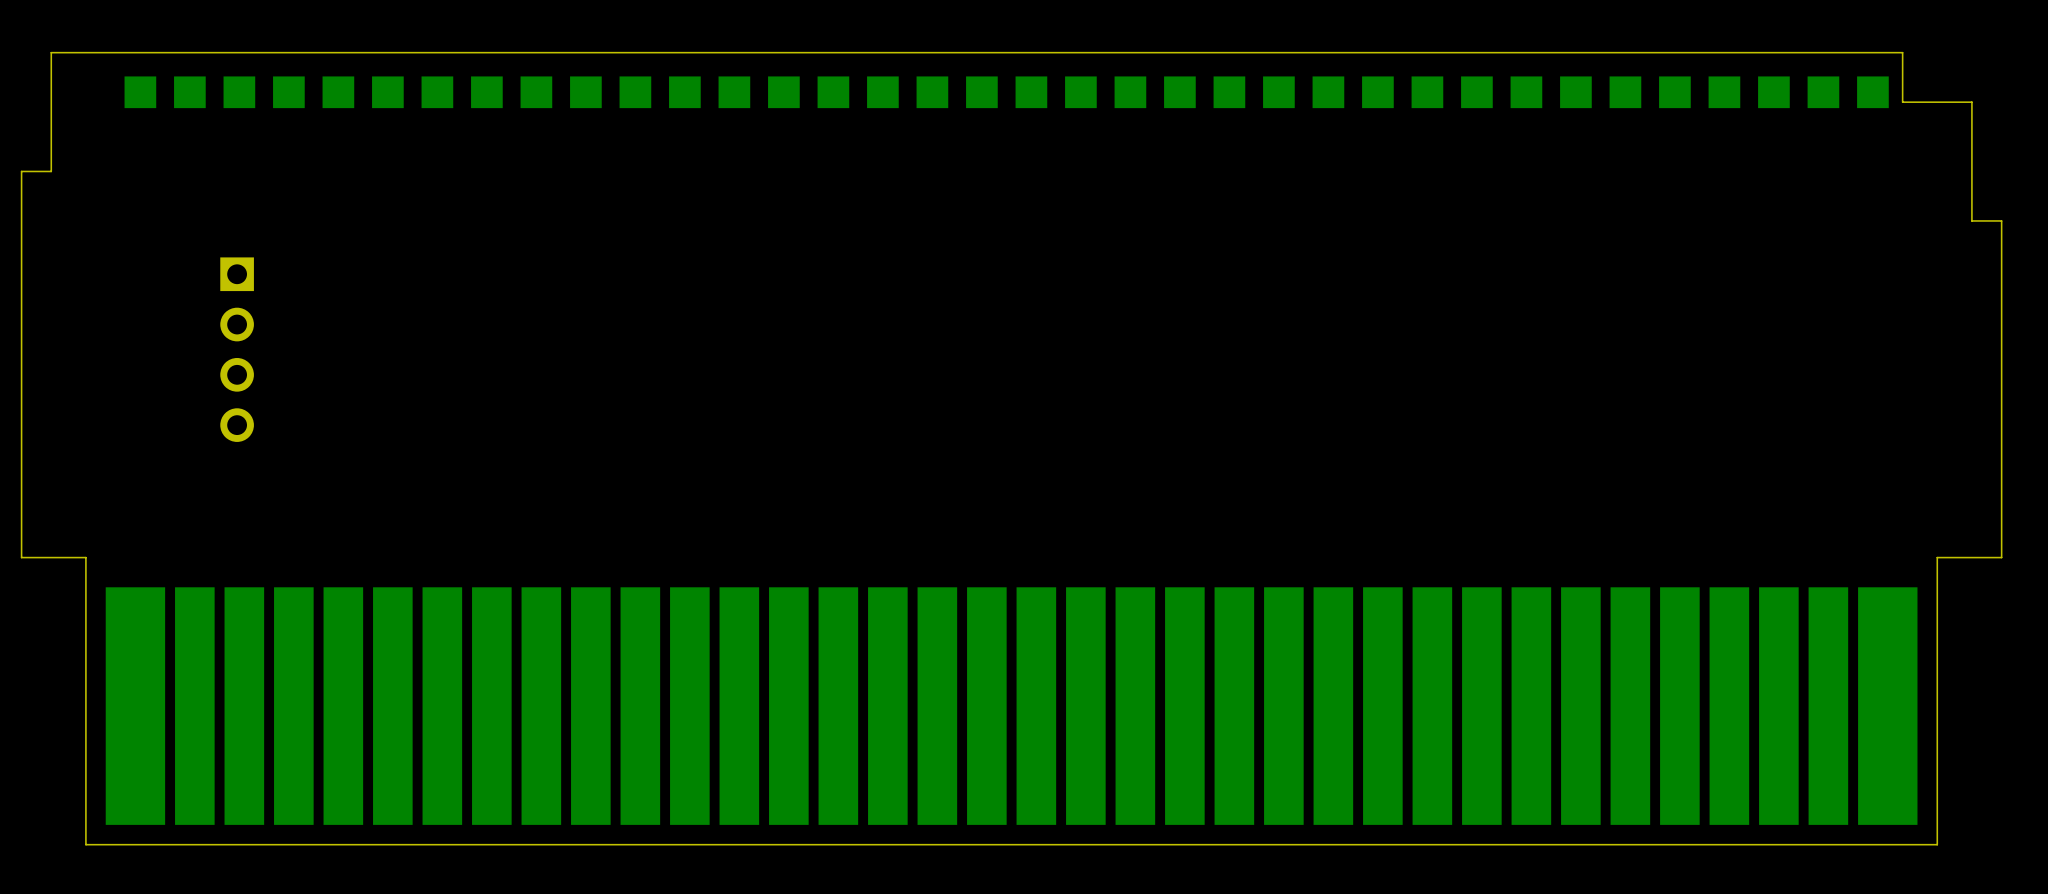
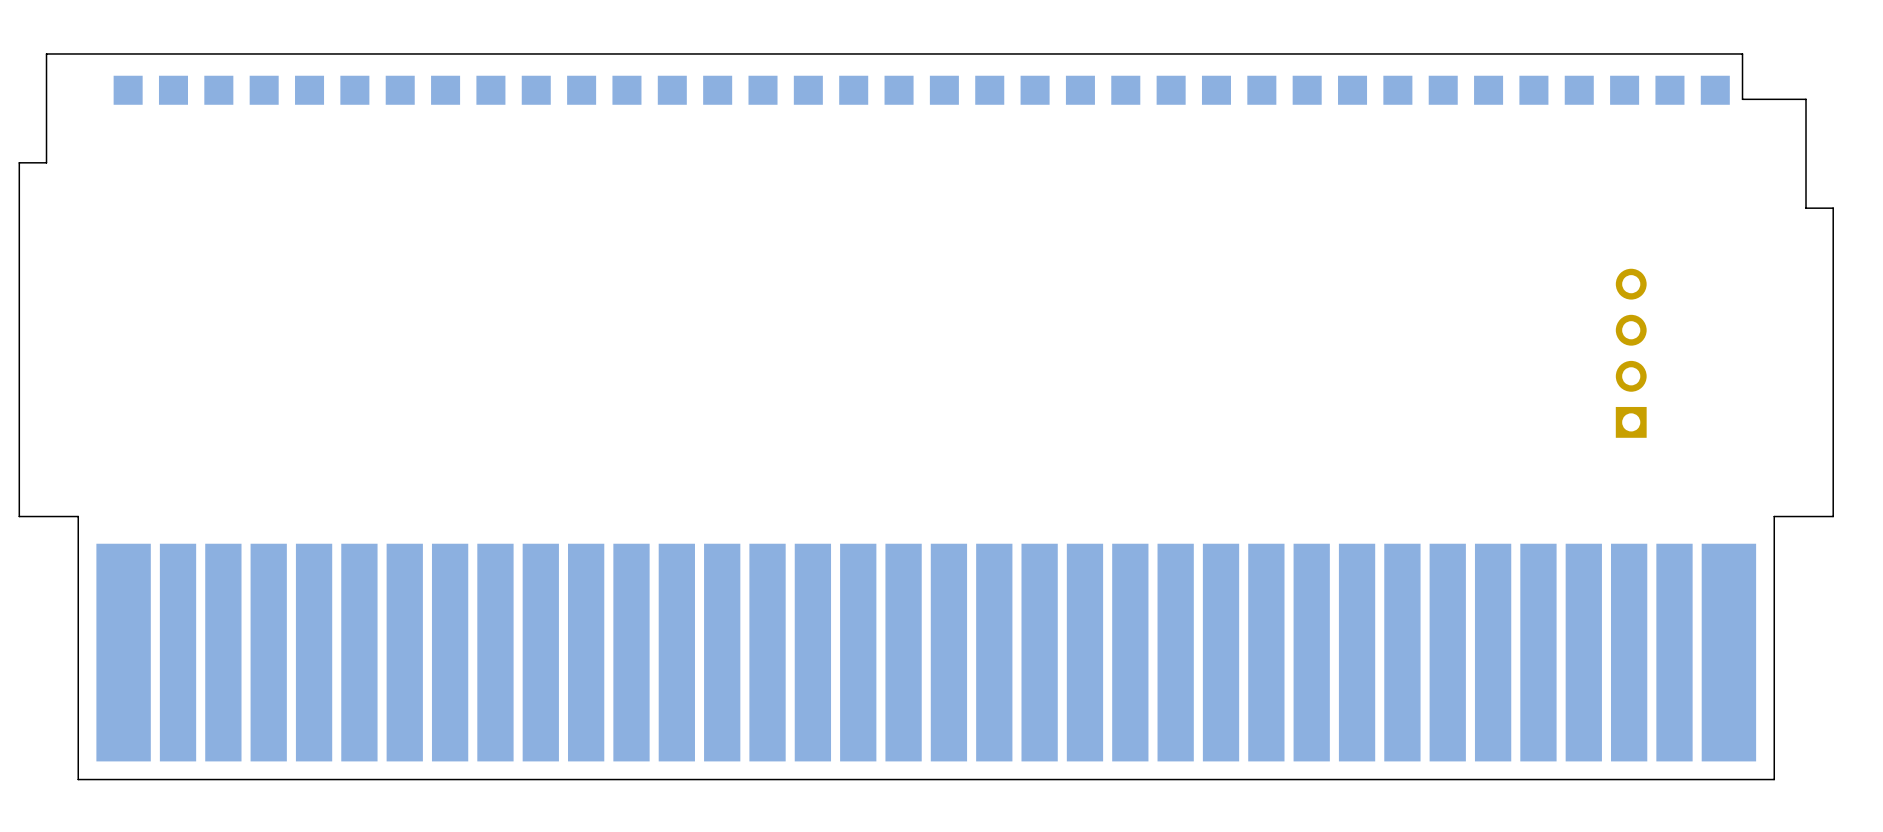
part: (237, 349) -> none
part: none -> (1631, 353)

